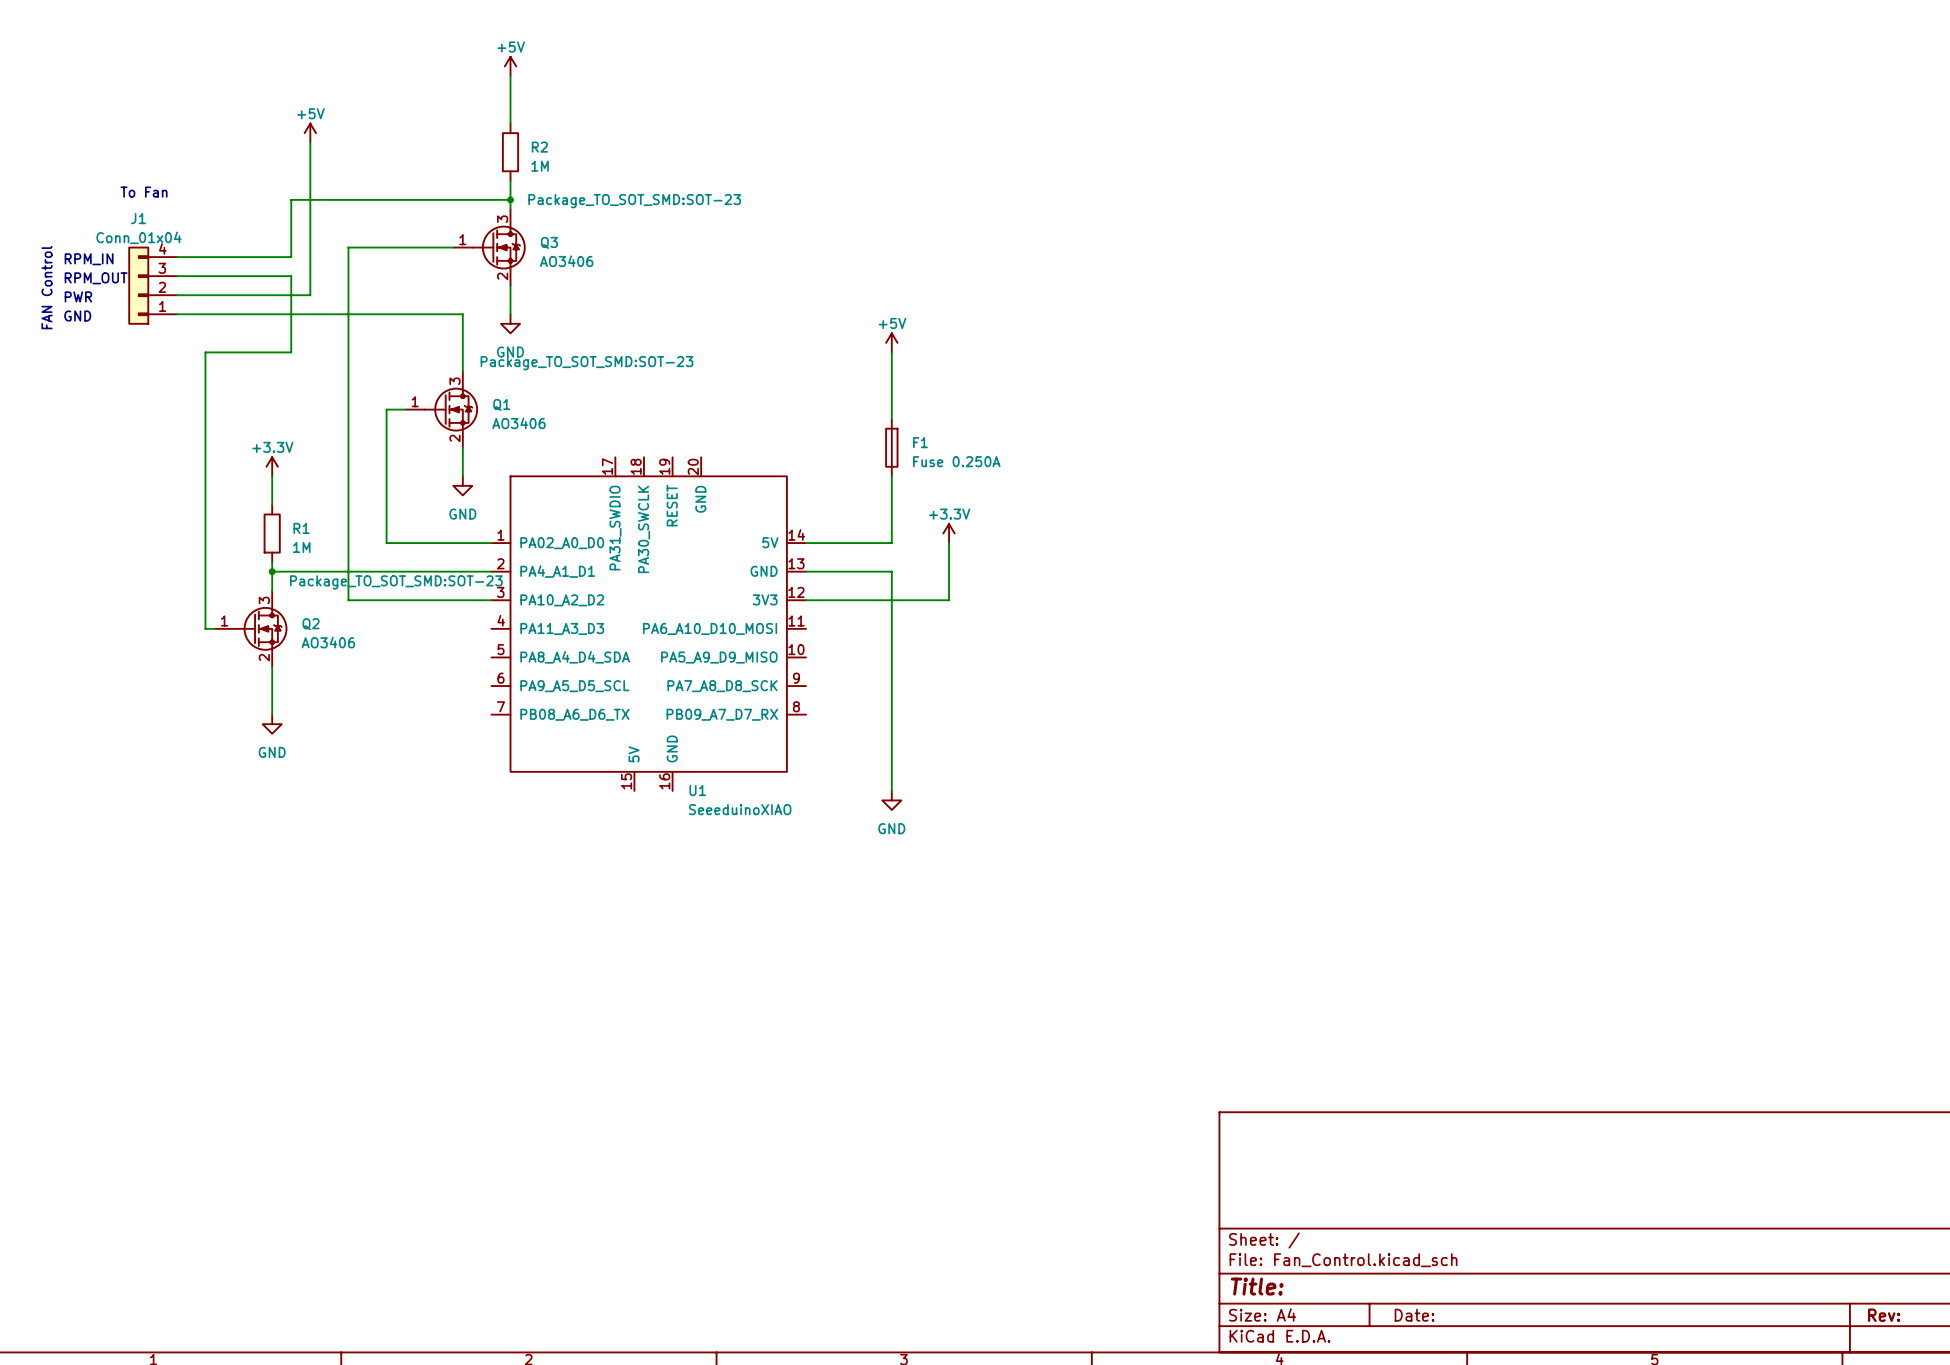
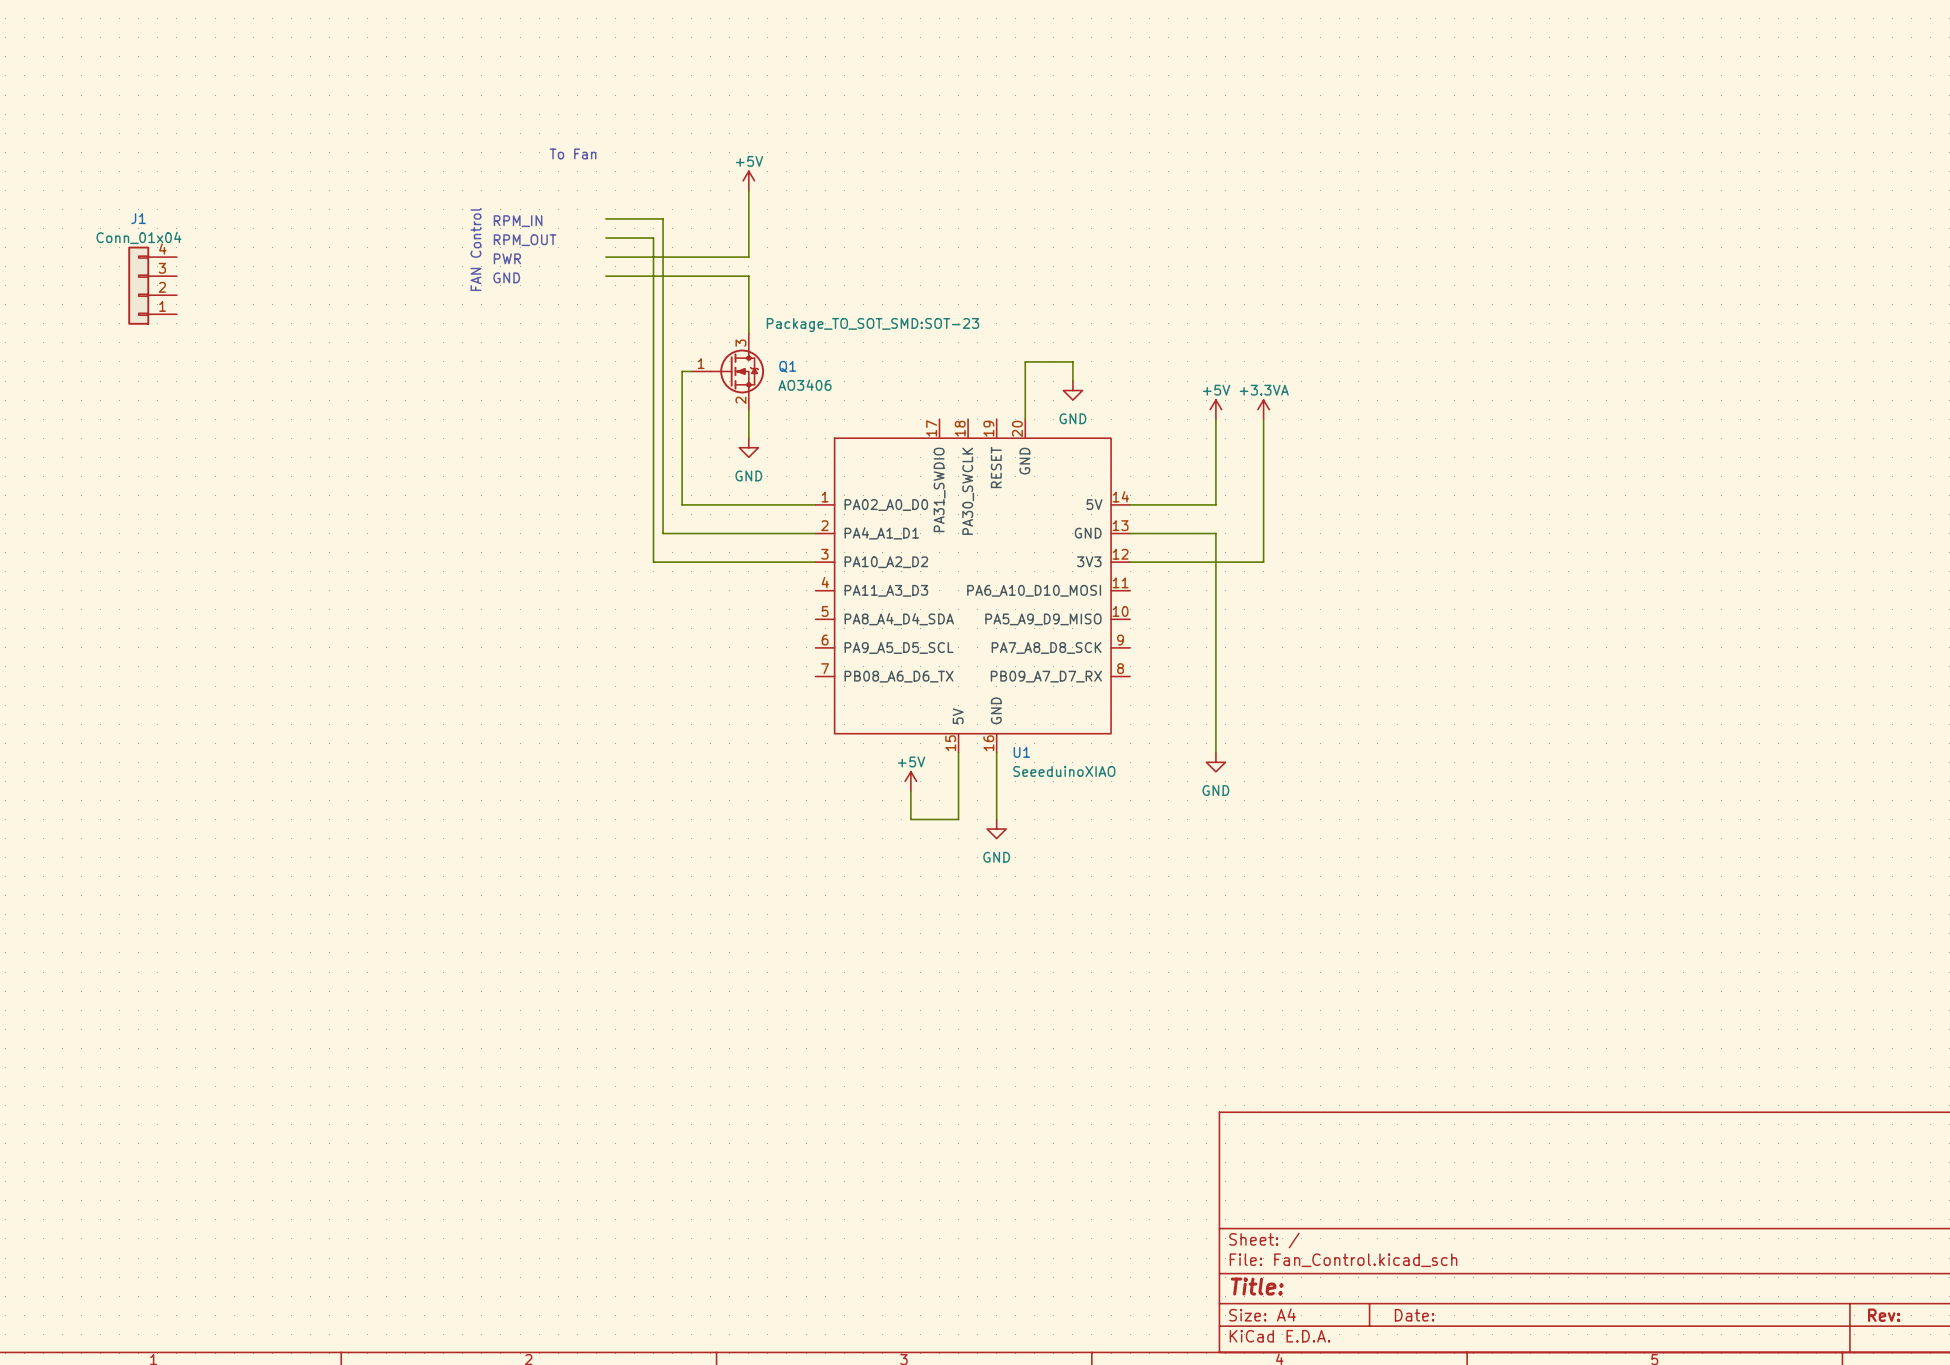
power symbol: +5V (510, 66) -> none
wire: (510, 75) (510, 123) -> none
power symbol: +5V (310, 133) -> none
wire: (310, 142) (310, 295) (176, 295) -> none
R2: 1M (510, 152) -> none
text: none -> To Fan (572, 153)
wire: (510, 180) (510, 209) -> none
power symbol: none -> +5V (748, 180)
wire: none -> (748, 190) (748, 257) (605, 257)
text: To Fan (144, 192) -> none
wire: (510, 199) (291, 199) (291, 257) (176, 257) -> none
junction: (510, 199) -> none
wire: none -> (605, 218) (663, 218) (663, 533) (815, 533)
text: none -> RPM_IN (518, 221)
wire: none -> (605, 238) (653, 238) (653, 562) (815, 562)
text: none -> RPM_OUT (525, 240)
wire: (453, 247) (348, 247) (348, 600) (491, 600) -> none
Q3: AO3406 (489, 247) -> none
text: none -> FAN Control (475, 249)
text: none -> PWR (507, 258)
text: RPM_IN (89, 259) -> none
wire: (176, 276) (291, 276) (291, 352) (205, 352) (205, 628) (215, 628) -> none
wire: none -> (605, 276) (748, 276) (748, 333)
text: none -> GND (506, 277)
text: RPM_OUT (96, 278) -> none
wire: (510, 285) (510, 314) -> none
text: FAN Control (47, 287) -> none
text: PWR (78, 296) -> none
wire: (176, 314) (462, 314) (462, 371) -> none
text: GND (77, 316) -> none
power symbol: GND (510, 323) -> none
power symbol: +5V (891, 342) -> none
wire: (891, 352) (891, 419) -> none
wire: none -> (691, 371) (682, 371) (682, 504) (815, 504)
wire: none -> (1072, 381) (1072, 361) (1025, 361) (1025, 419)
power symbol: none -> GND (1072, 390)
wire: (405, 409) (386, 409) (386, 543) (491, 543) -> none
Q1 position: (441, 409) -> (727, 371)
wire: none -> (748, 409) (748, 438)
power symbol: none -> +5V (1215, 409)
power symbol: none -> +3.3VA (1263, 409)
wire: none -> (1215, 419) (1215, 504) (1130, 504)
wire: none -> (1263, 419) (1263, 562) (1130, 562)
wire: (462, 447) (462, 476) -> none
power symbol: none -> GND (748, 447)
F1: Fuse 0.250A (891, 447) -> none
power symbol: +3.3V (272, 466) -> none
wire: (272, 476) (272, 504) -> none
wire: (891, 476) (891, 543) (806, 543) -> none
power symbol: GND (462, 485) -> none
R1: 1M (272, 533) -> none
power symbol: +3.3V (949, 533) -> none
wire: none -> (1130, 533) (1215, 533) (1215, 752)
wire: (949, 543) (949, 600) (806, 600) -> none
wire: (272, 562) (272, 590) -> none
wire: (272, 571) (491, 571) -> none
junction: (272, 571) -> none
wire: (806, 571) (891, 571) (891, 790) -> none
U1 position: (648, 624) -> (972, 585)
Q2: AO3406 (251, 628) -> none
wire: (272, 666) (272, 714) -> none
power symbol: GND (272, 724) -> none
wire: none -> (958, 752) (958, 819) (910, 819) (910, 790)
wire: none -> (996, 752) (996, 819)
power symbol: none -> GND (1215, 762)
power symbol: none -> +5V (910, 781)
power symbol position: GND (891, 800) -> GND (996, 829)

